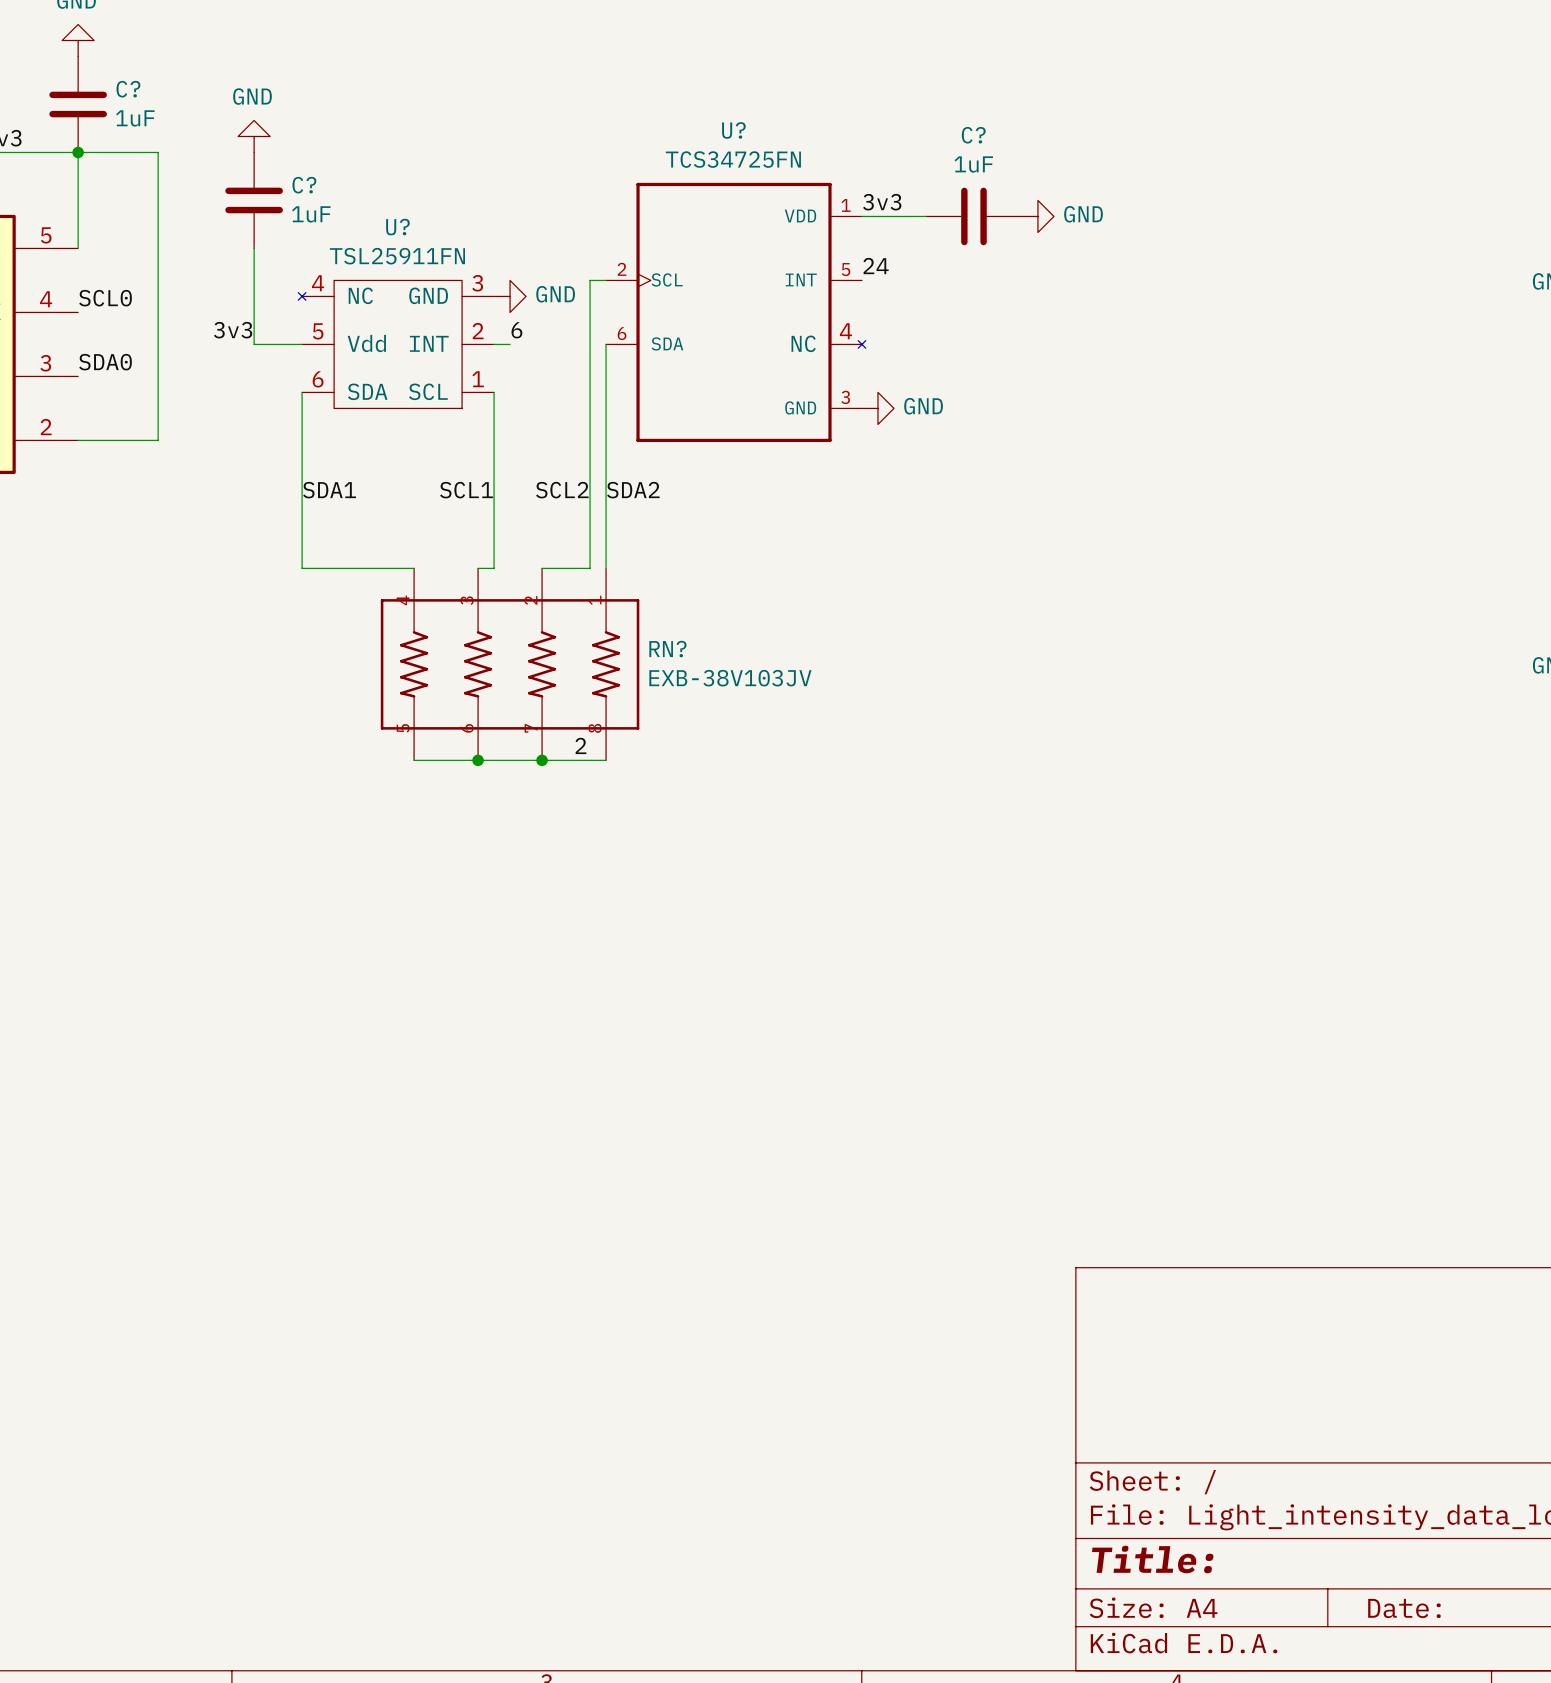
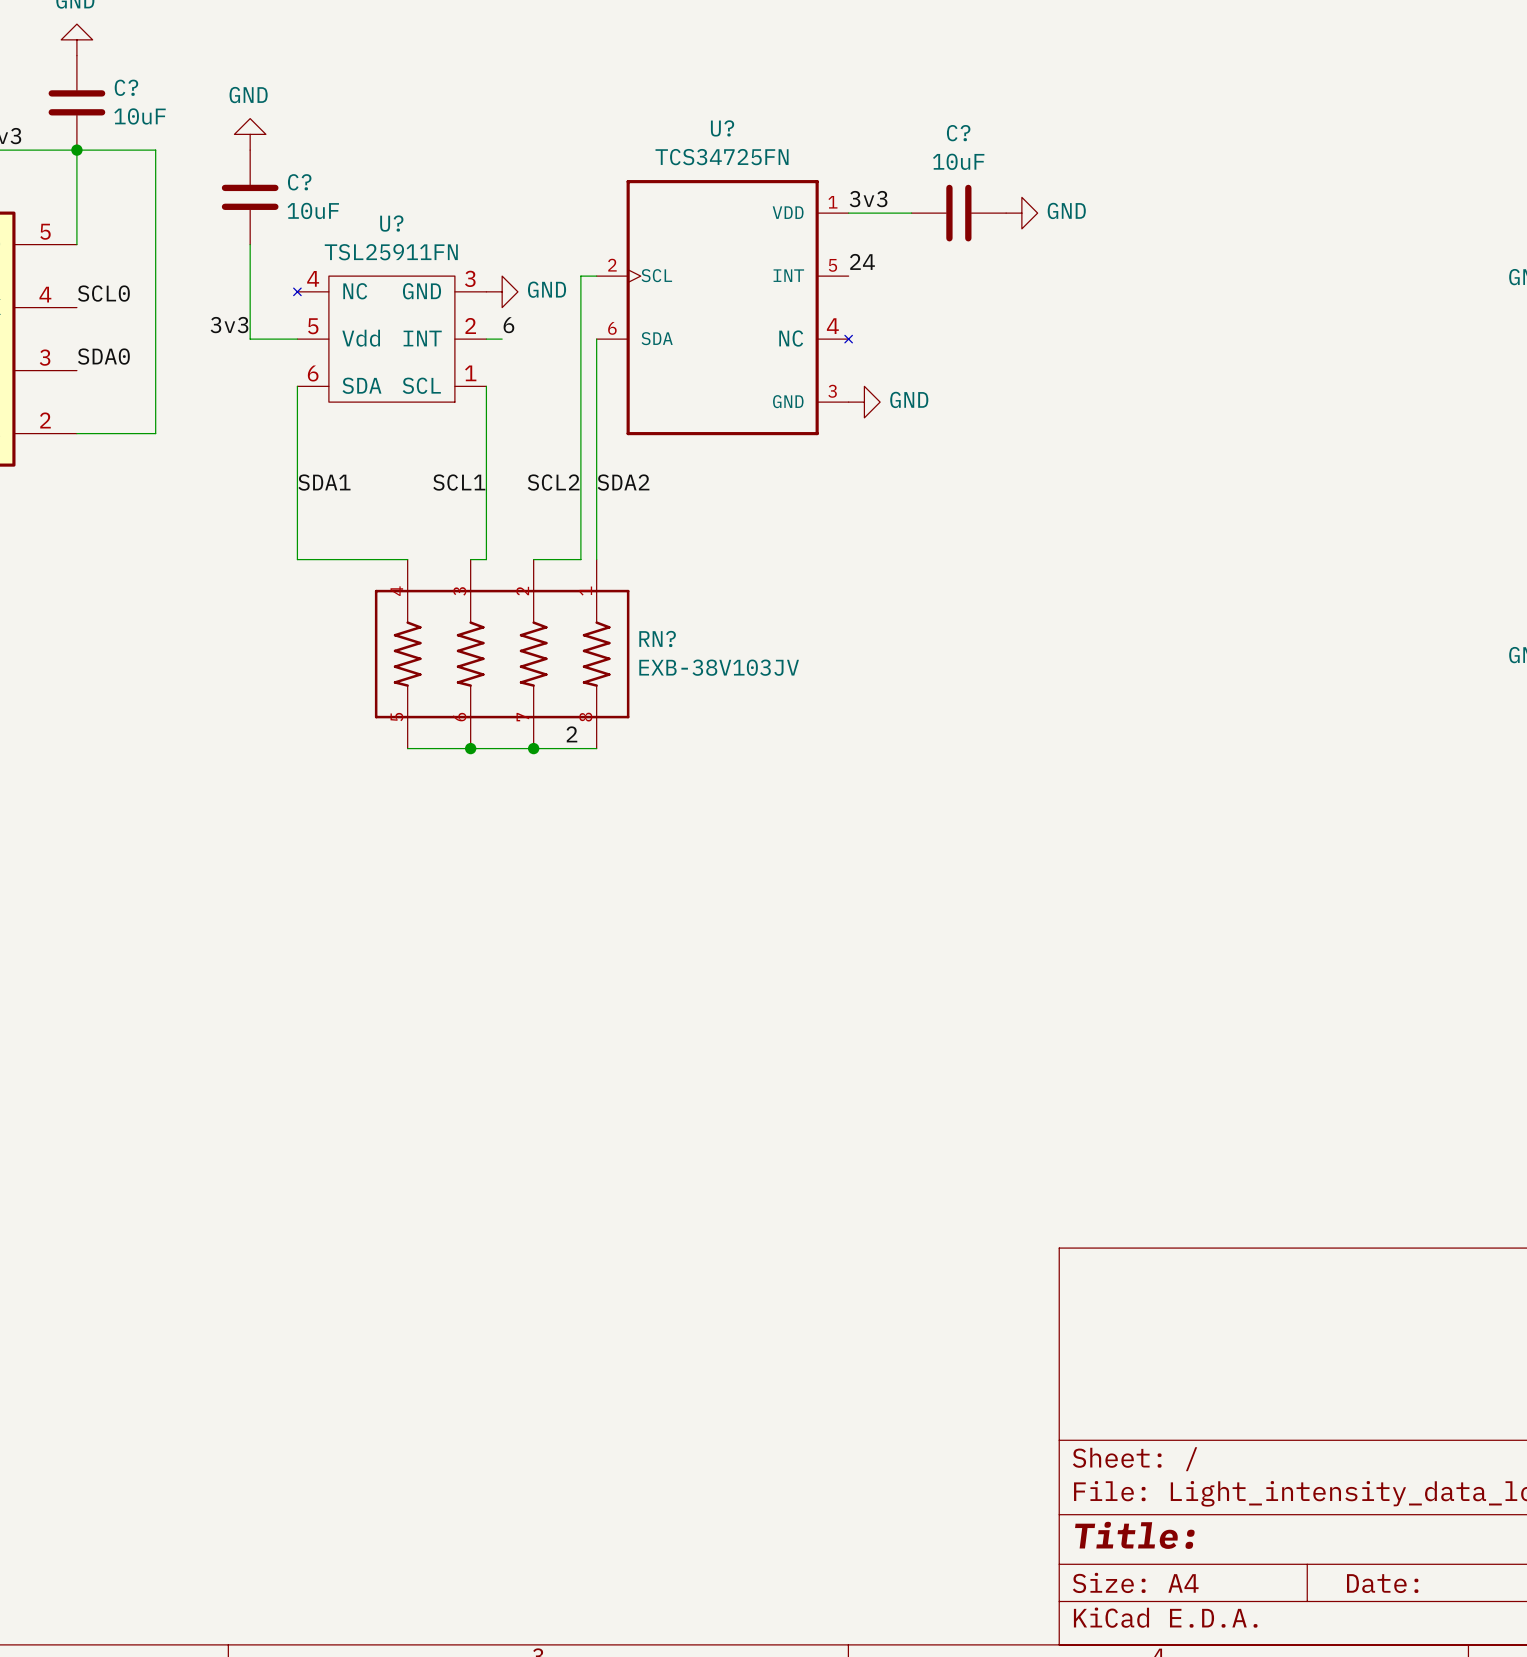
C? value: 1uF (135, 118) -> 10uF (140, 116)
C? value: 1uF (973, 164) -> 10uF (958, 161)
C? value: 1uF (311, 214) -> 10uF (313, 210)

